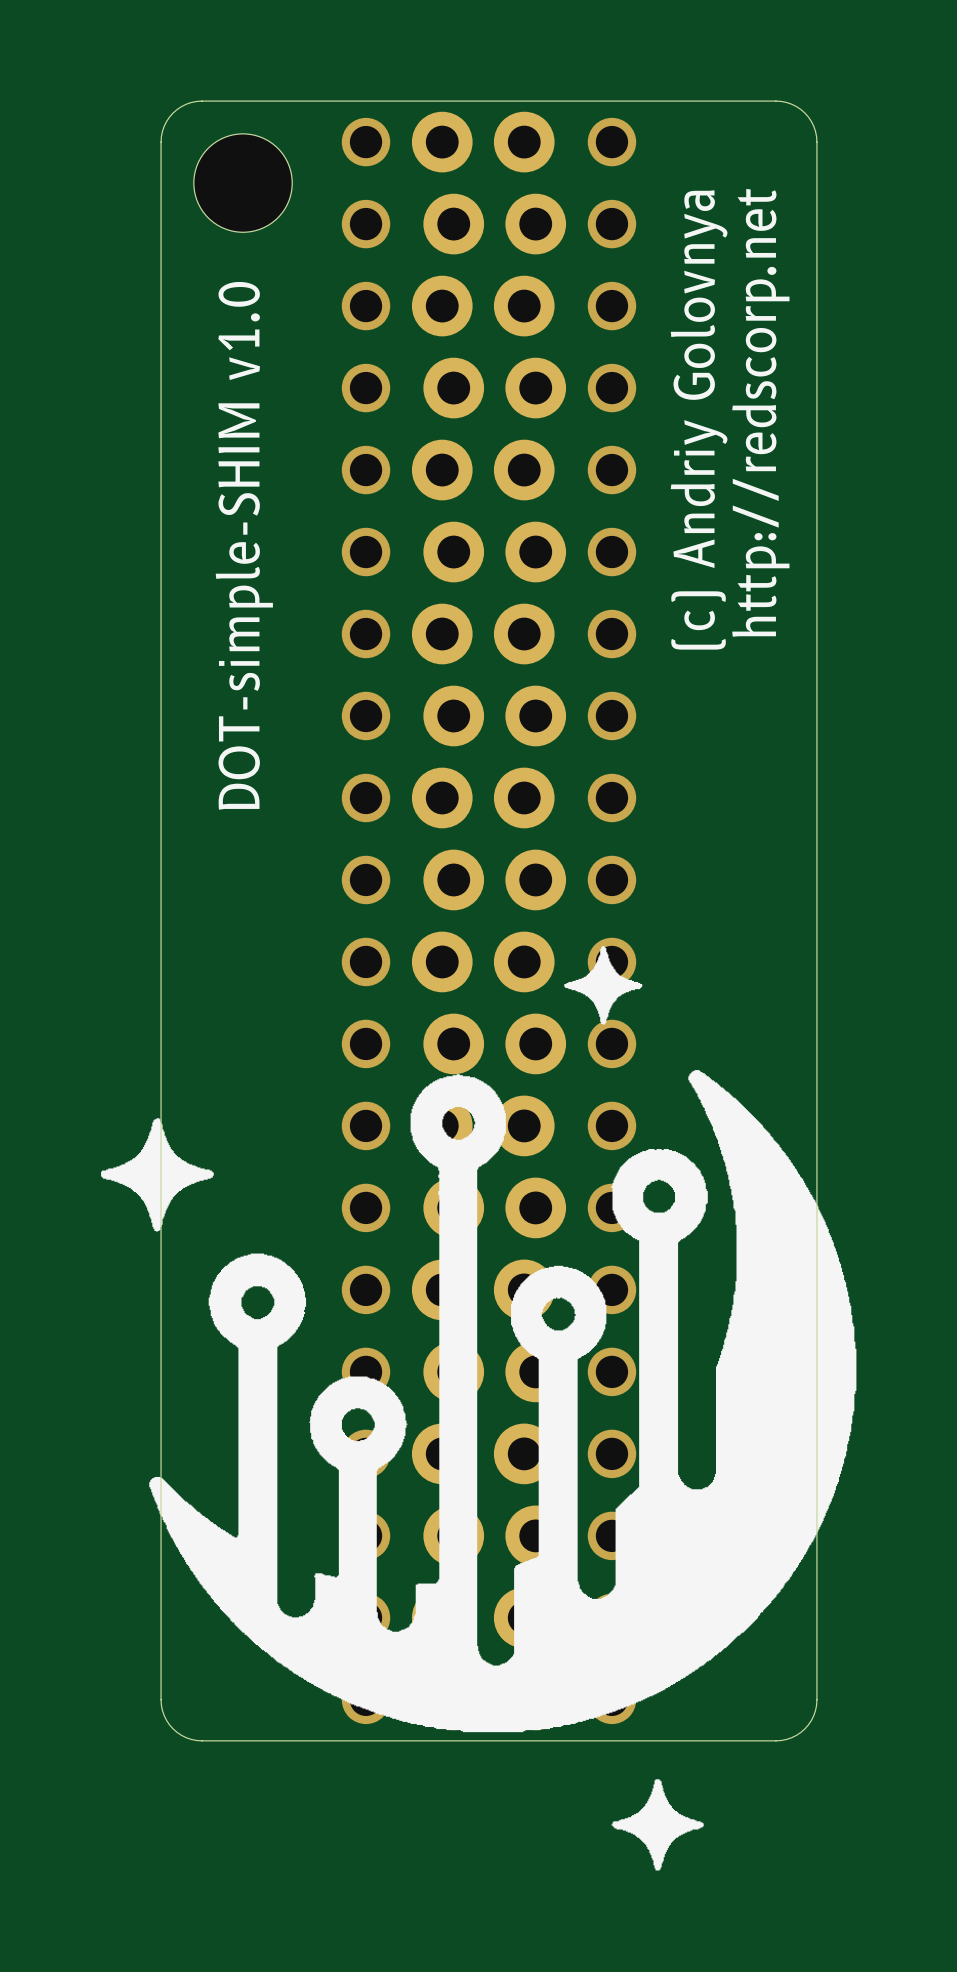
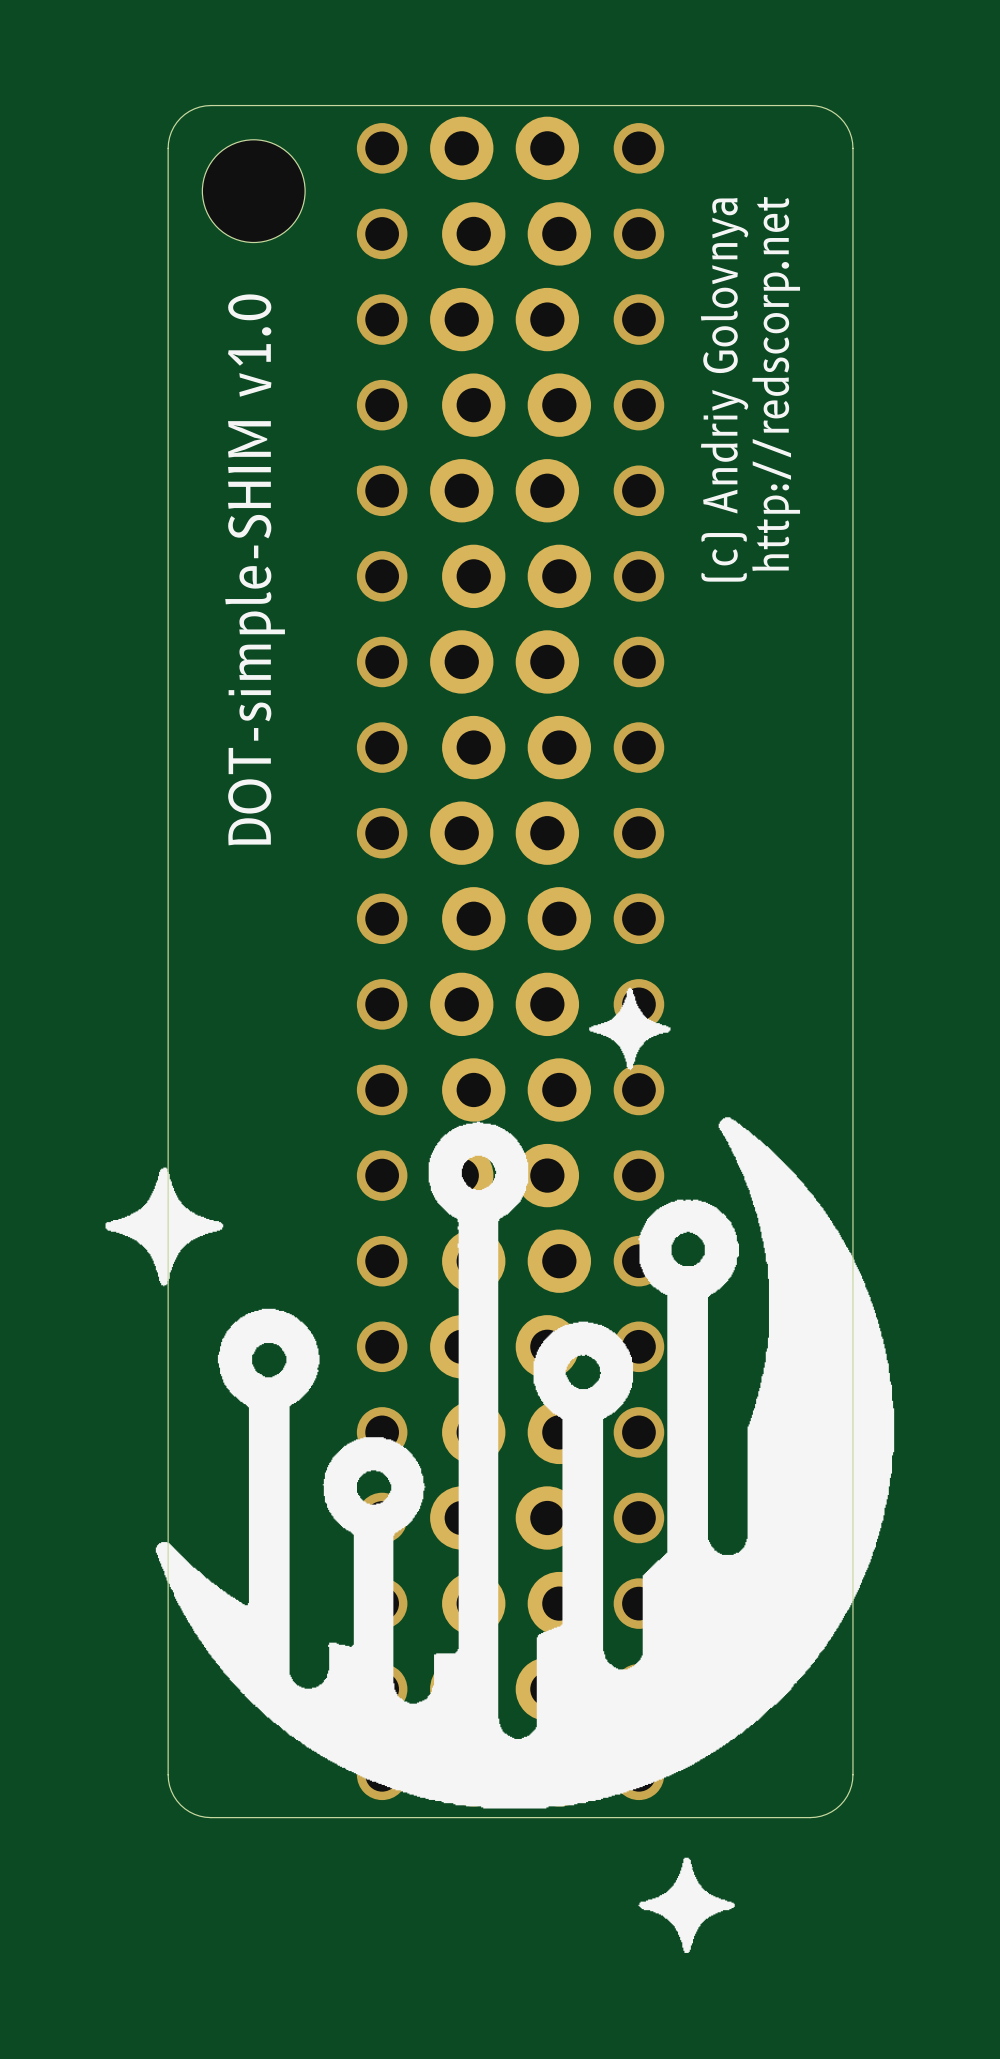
text: none -> http://redscorp.net (776, 383)
text: none -> (c) Andriy Golovnya (724, 389)
text: http://redscorp.net (760, 412) -> none
text: (c) Andriy Golovnya (699, 419) -> none

